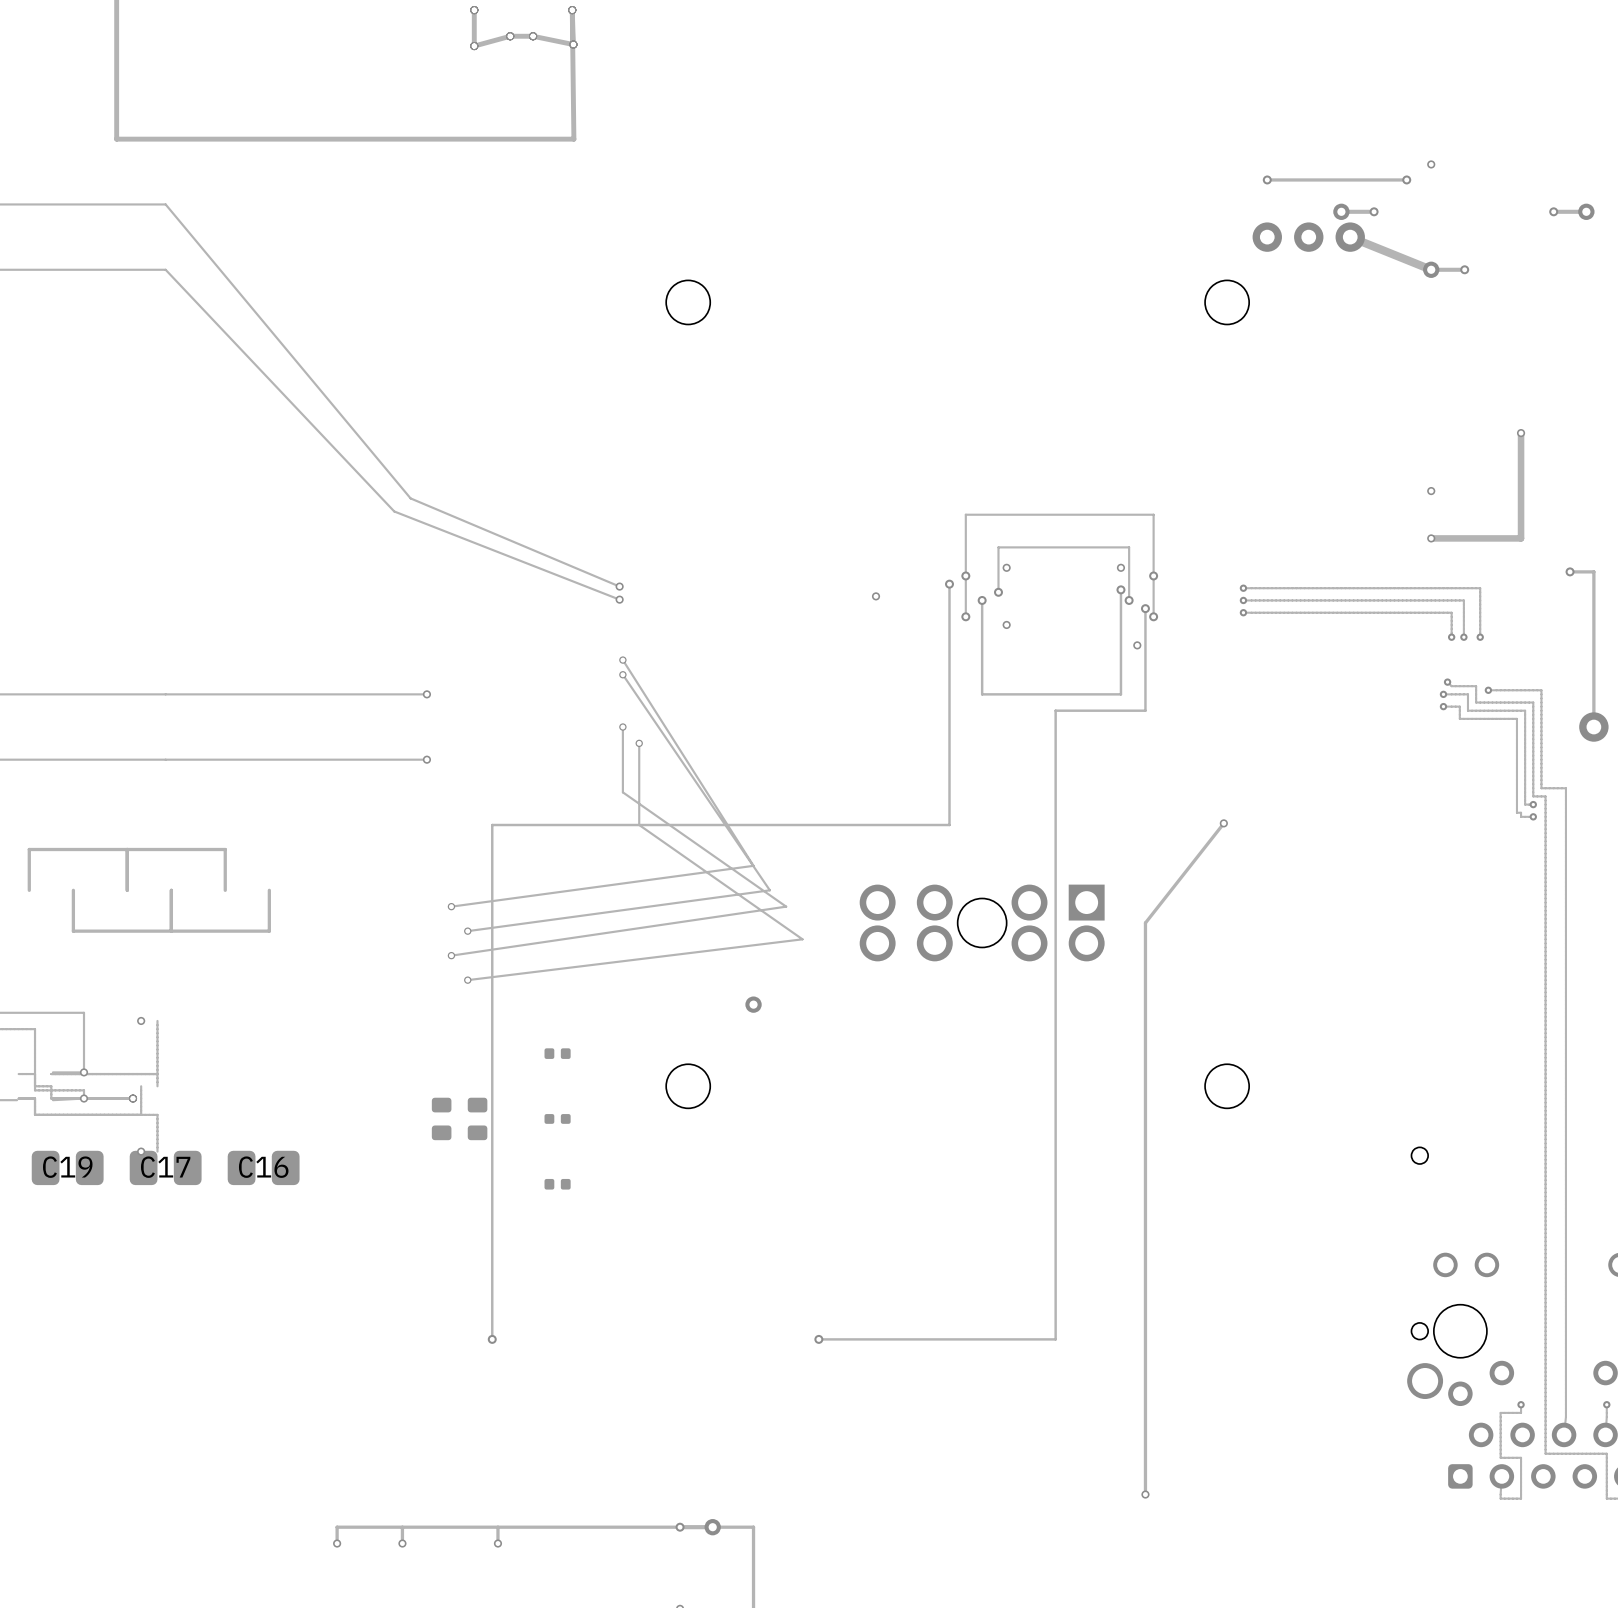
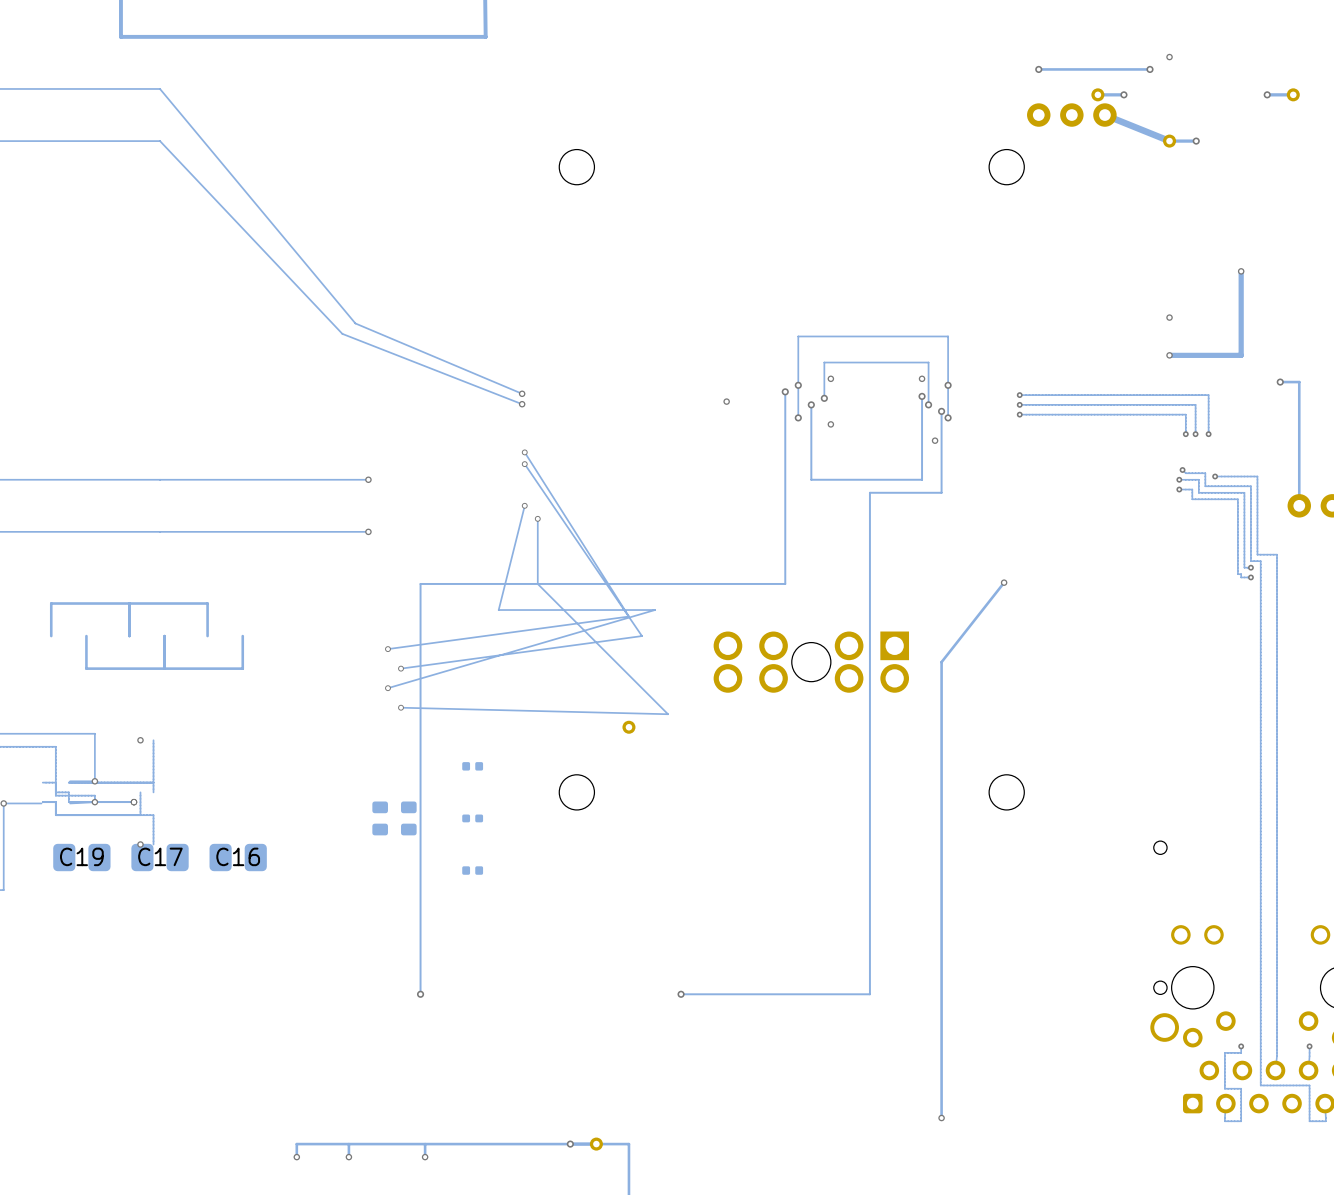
track: (622, 727) (622, 792) (786, 906) (451, 955) -> (524, 505) (498, 610) (655, 610) (387, 688)
track: (639, 825) (802, 939) (467, 980) -> (537, 583) (668, 714) (401, 707)

